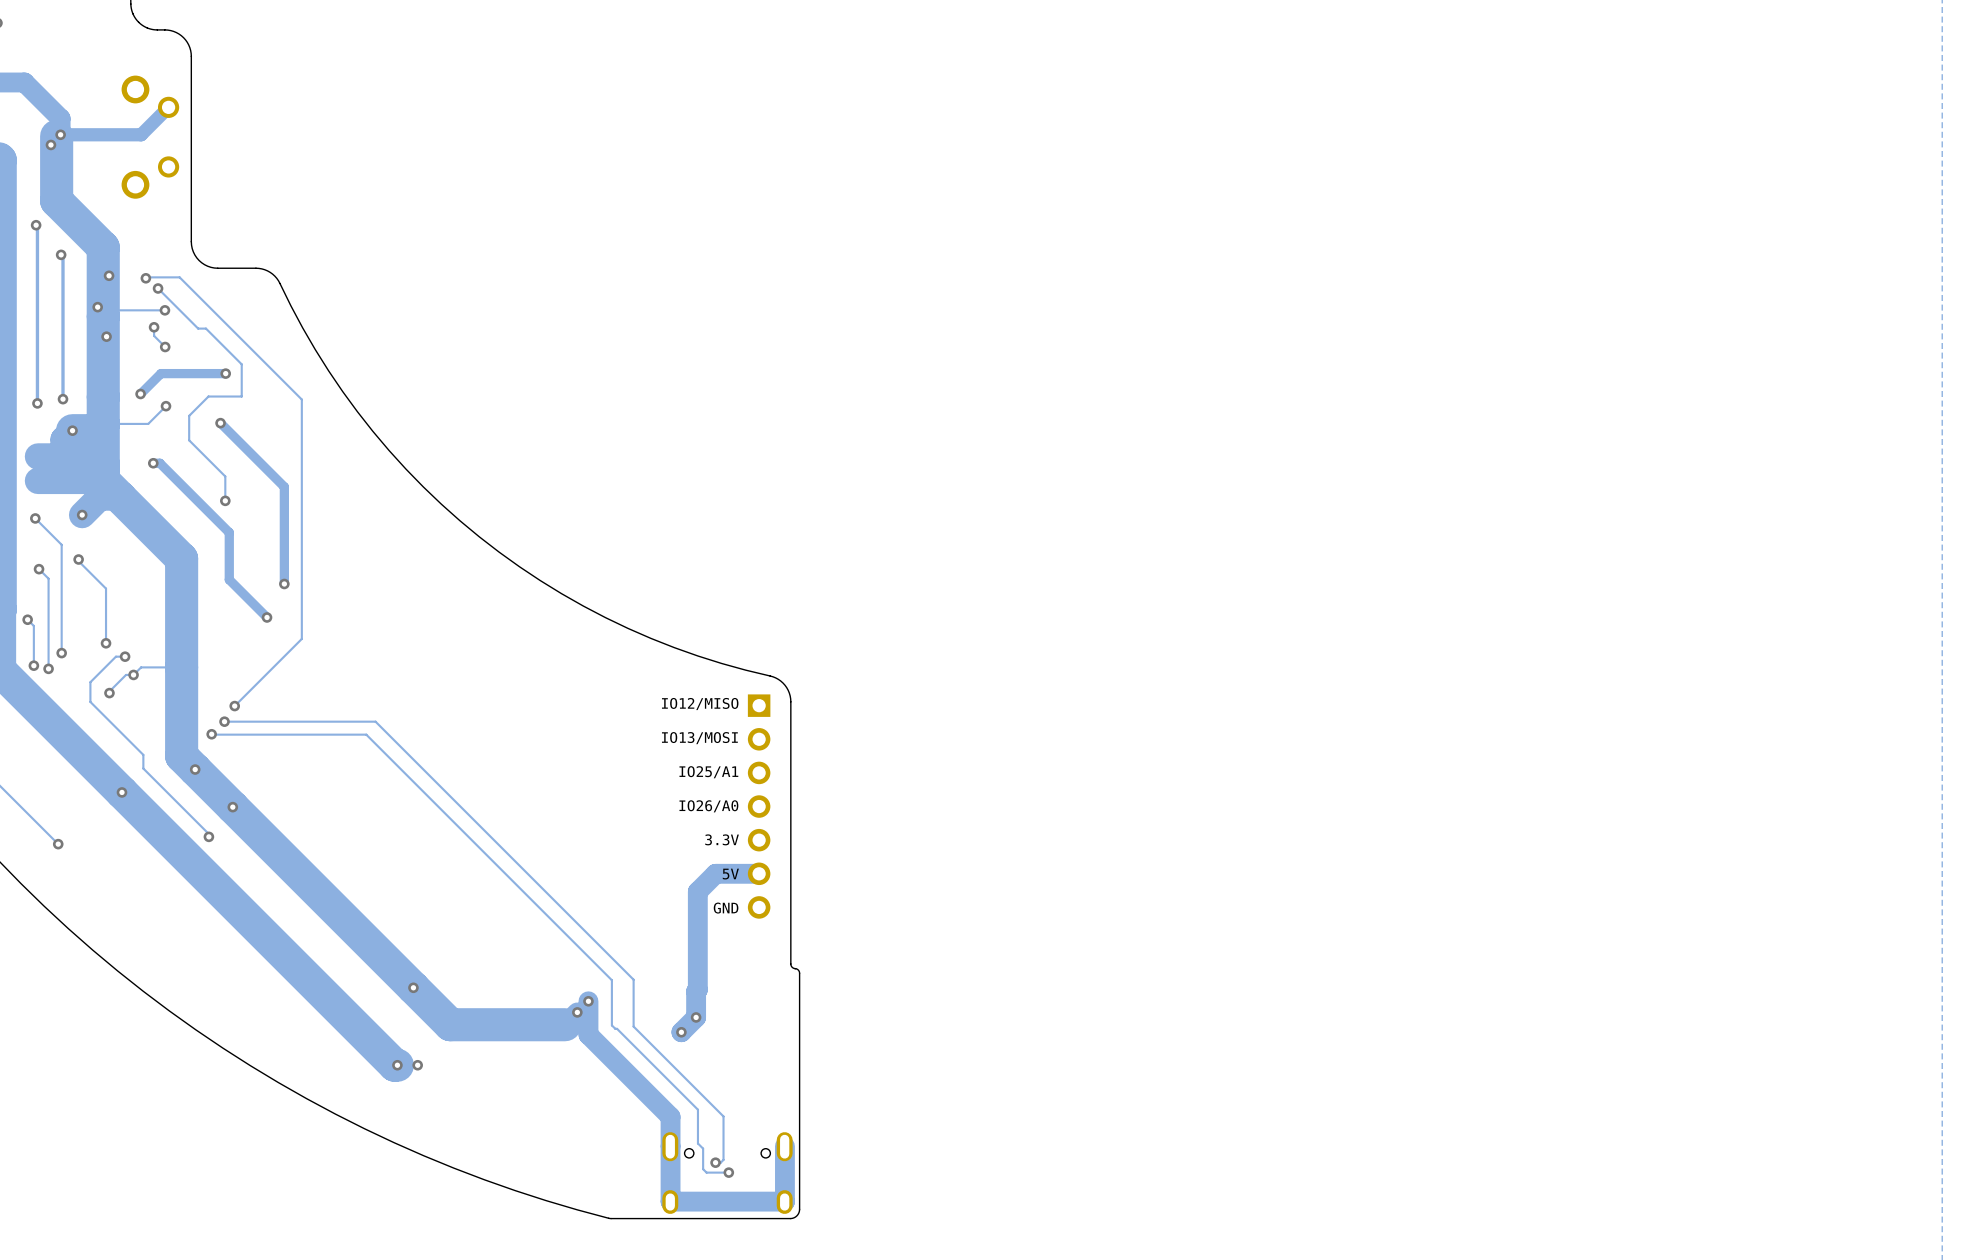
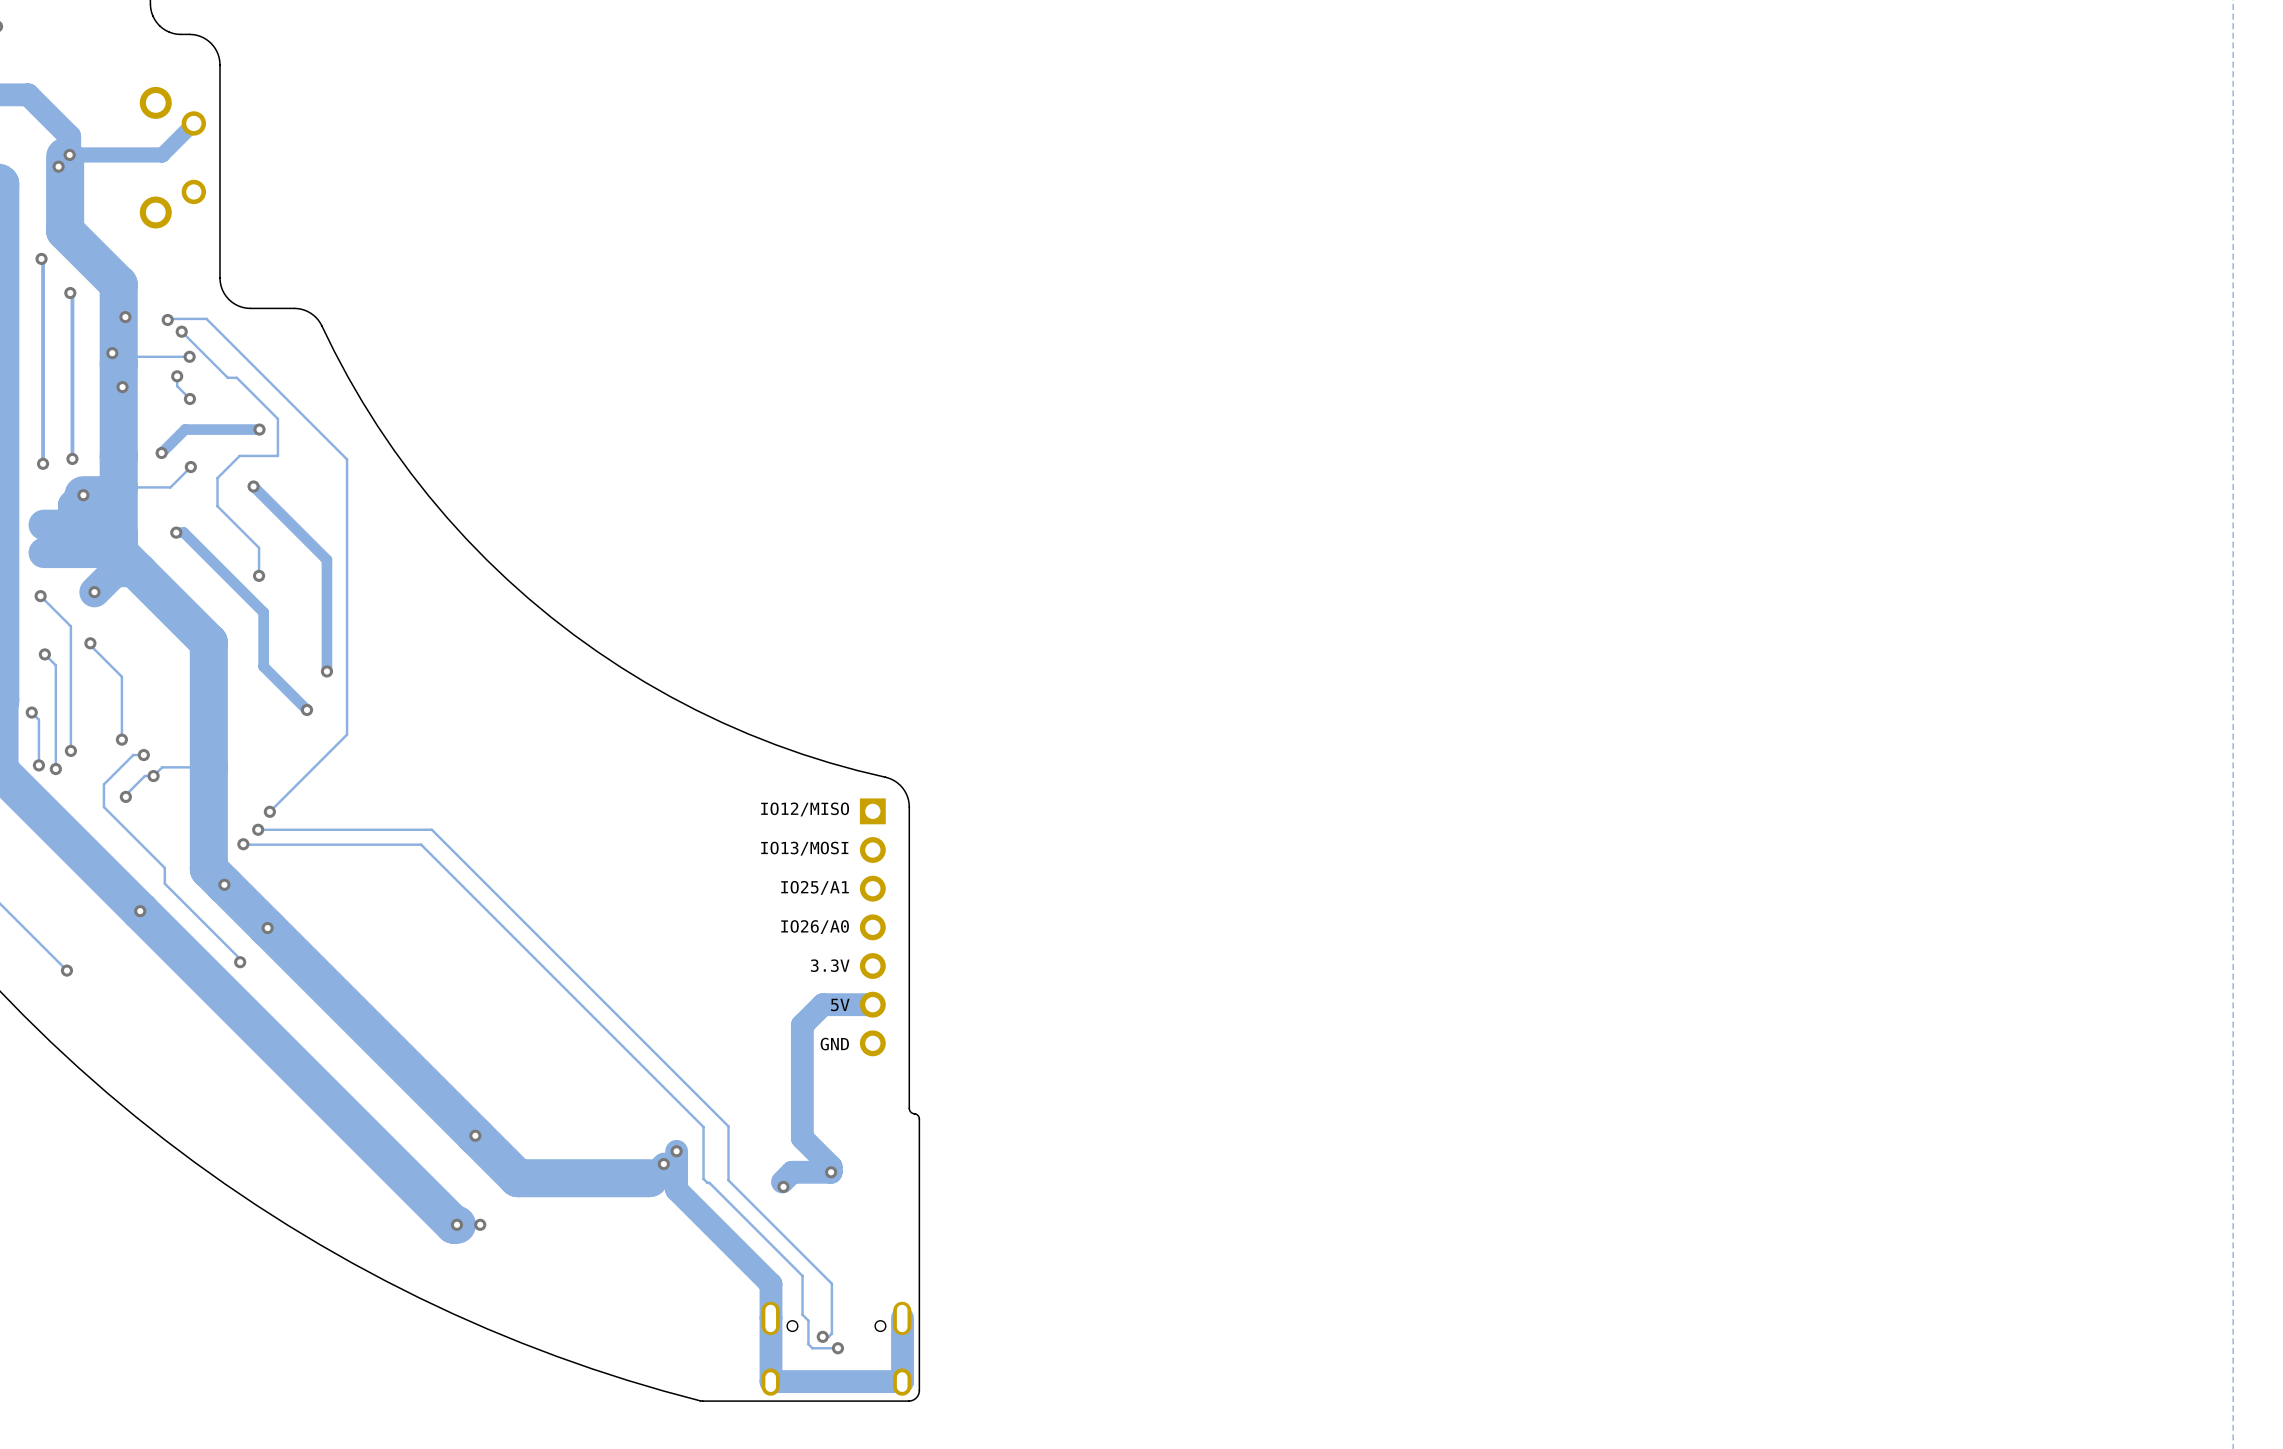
track: (697, 989) (696, 991) (696, 1017) (681, 1032) -> (802, 1138) (831, 1166) (831, 1172) (792, 1172) (782, 1182)
via position: (696, 1017) -> (831, 1172)

